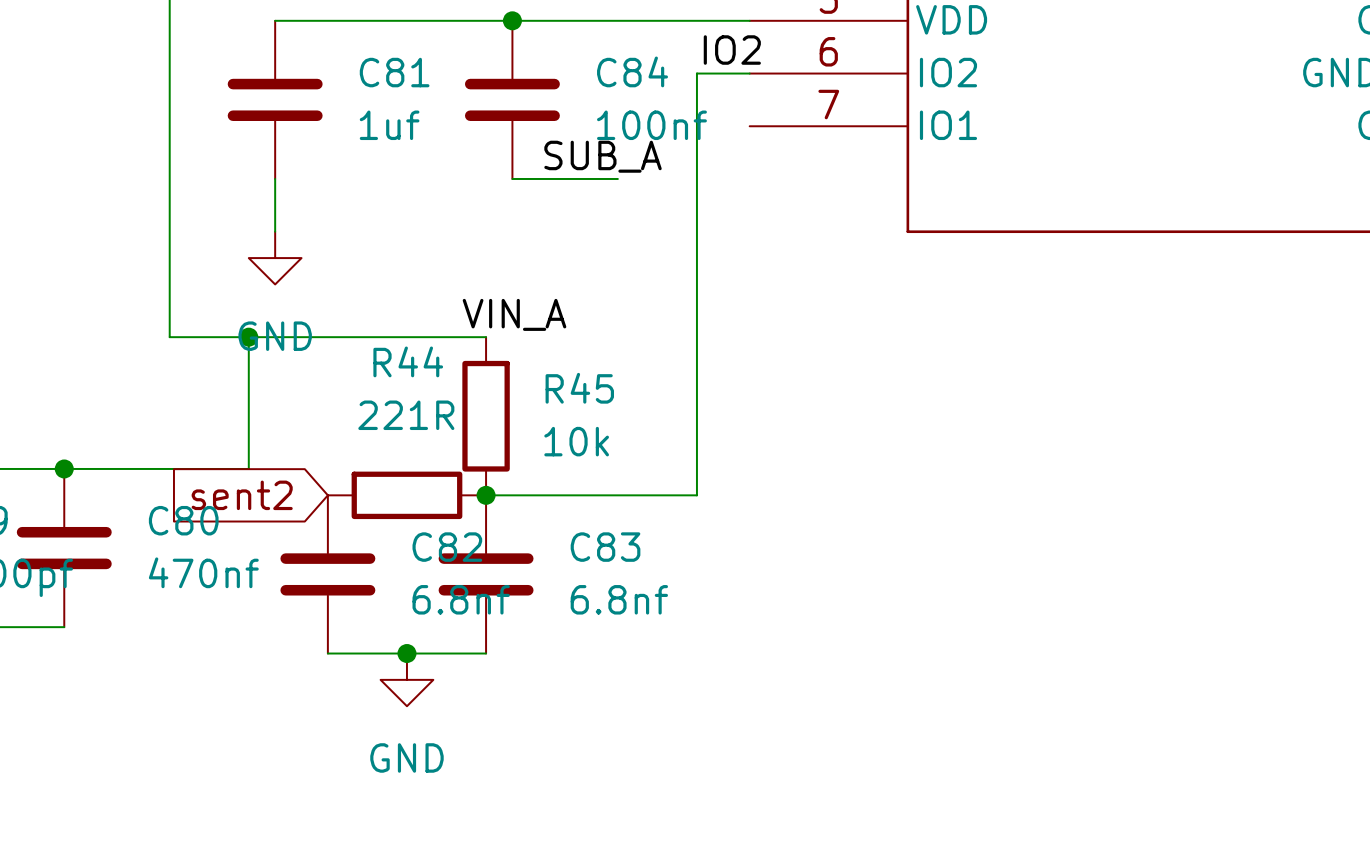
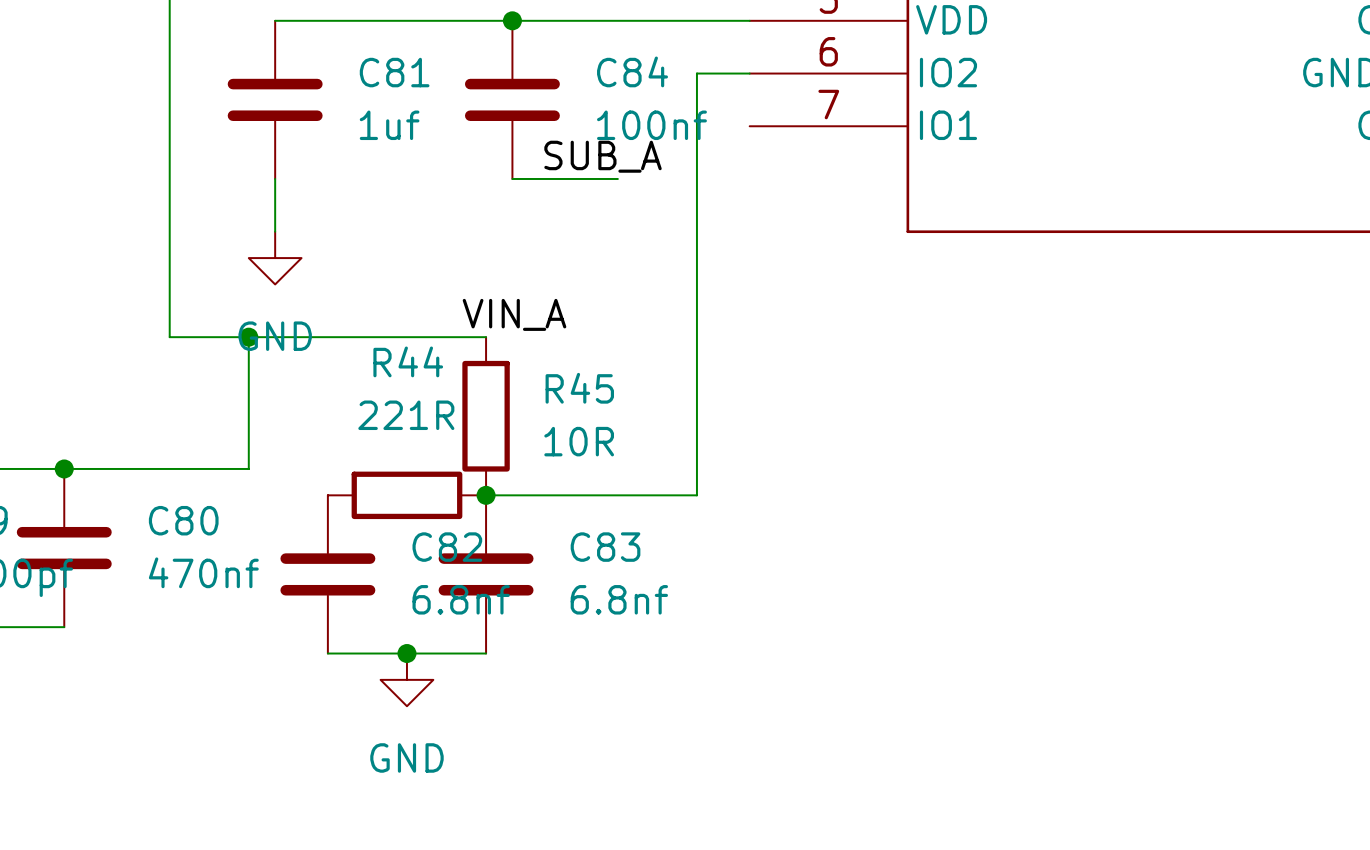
label: IO2 (732, 50) -> none
R45 value: 10k (576, 441) -> 10R (579, 441)
global label: sent2 (242, 495) -> none

